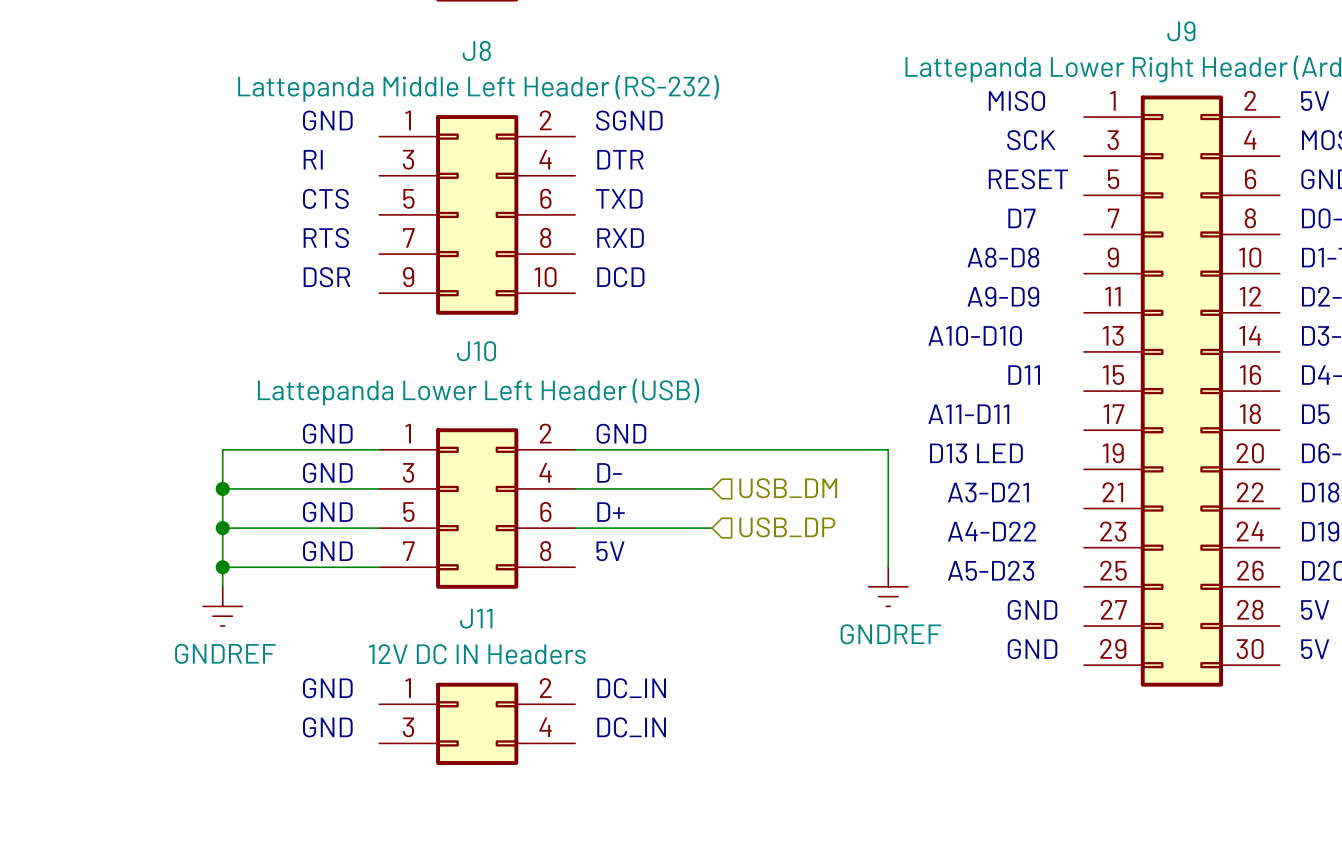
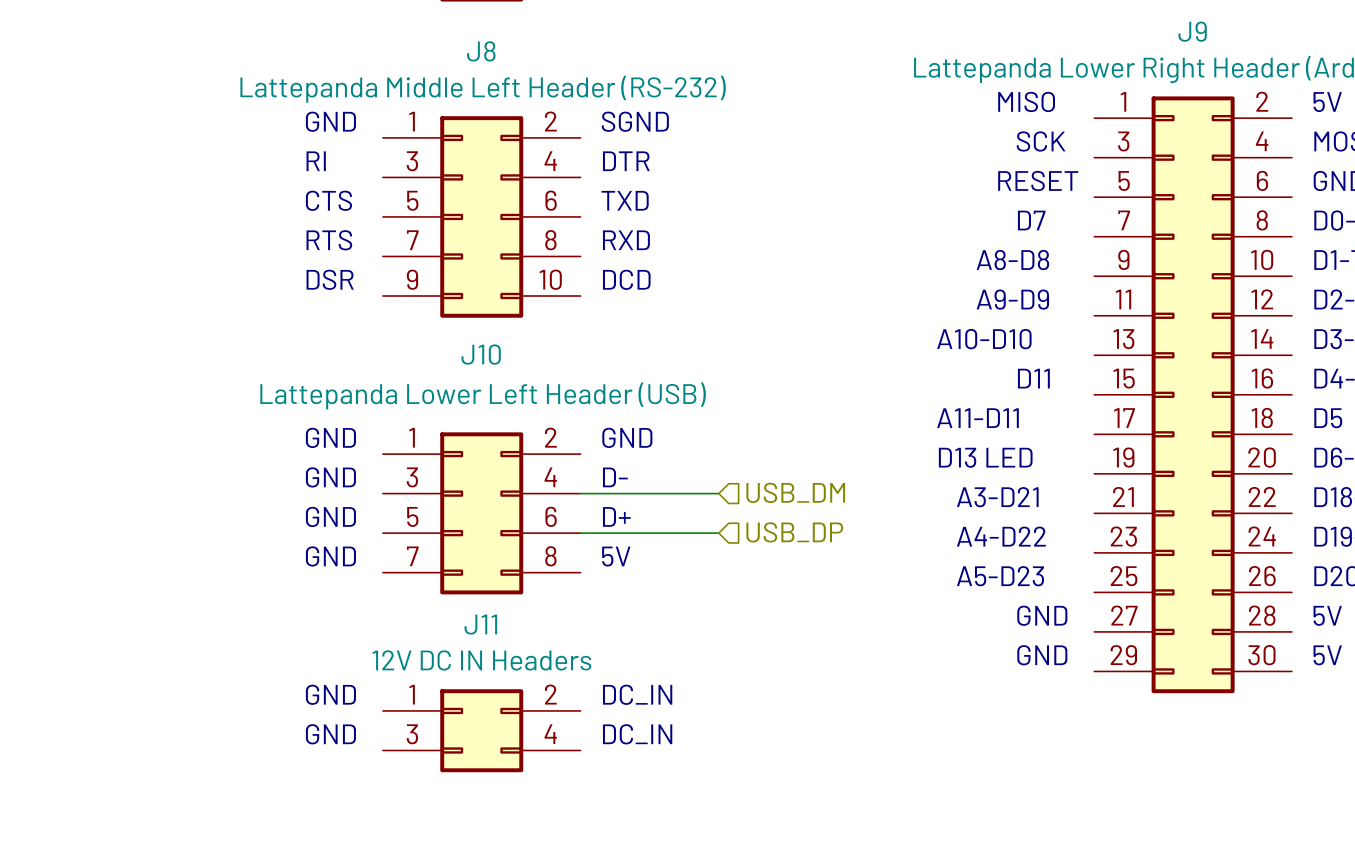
wire: (379, 449) (222, 449) (222, 586) -> none
wire: (575, 449) (888, 449) (888, 567) -> none
wire: (222, 488) (379, 488) -> none
junction: (222, 488) -> none
wire: (222, 528) (379, 528) -> none
junction: (222, 528) -> none
wire: (222, 567) (379, 567) -> none
junction: (222, 567) -> none
power symbol: GNDREF (888, 586) -> none
power symbol: GNDREF (222, 606) -> none

